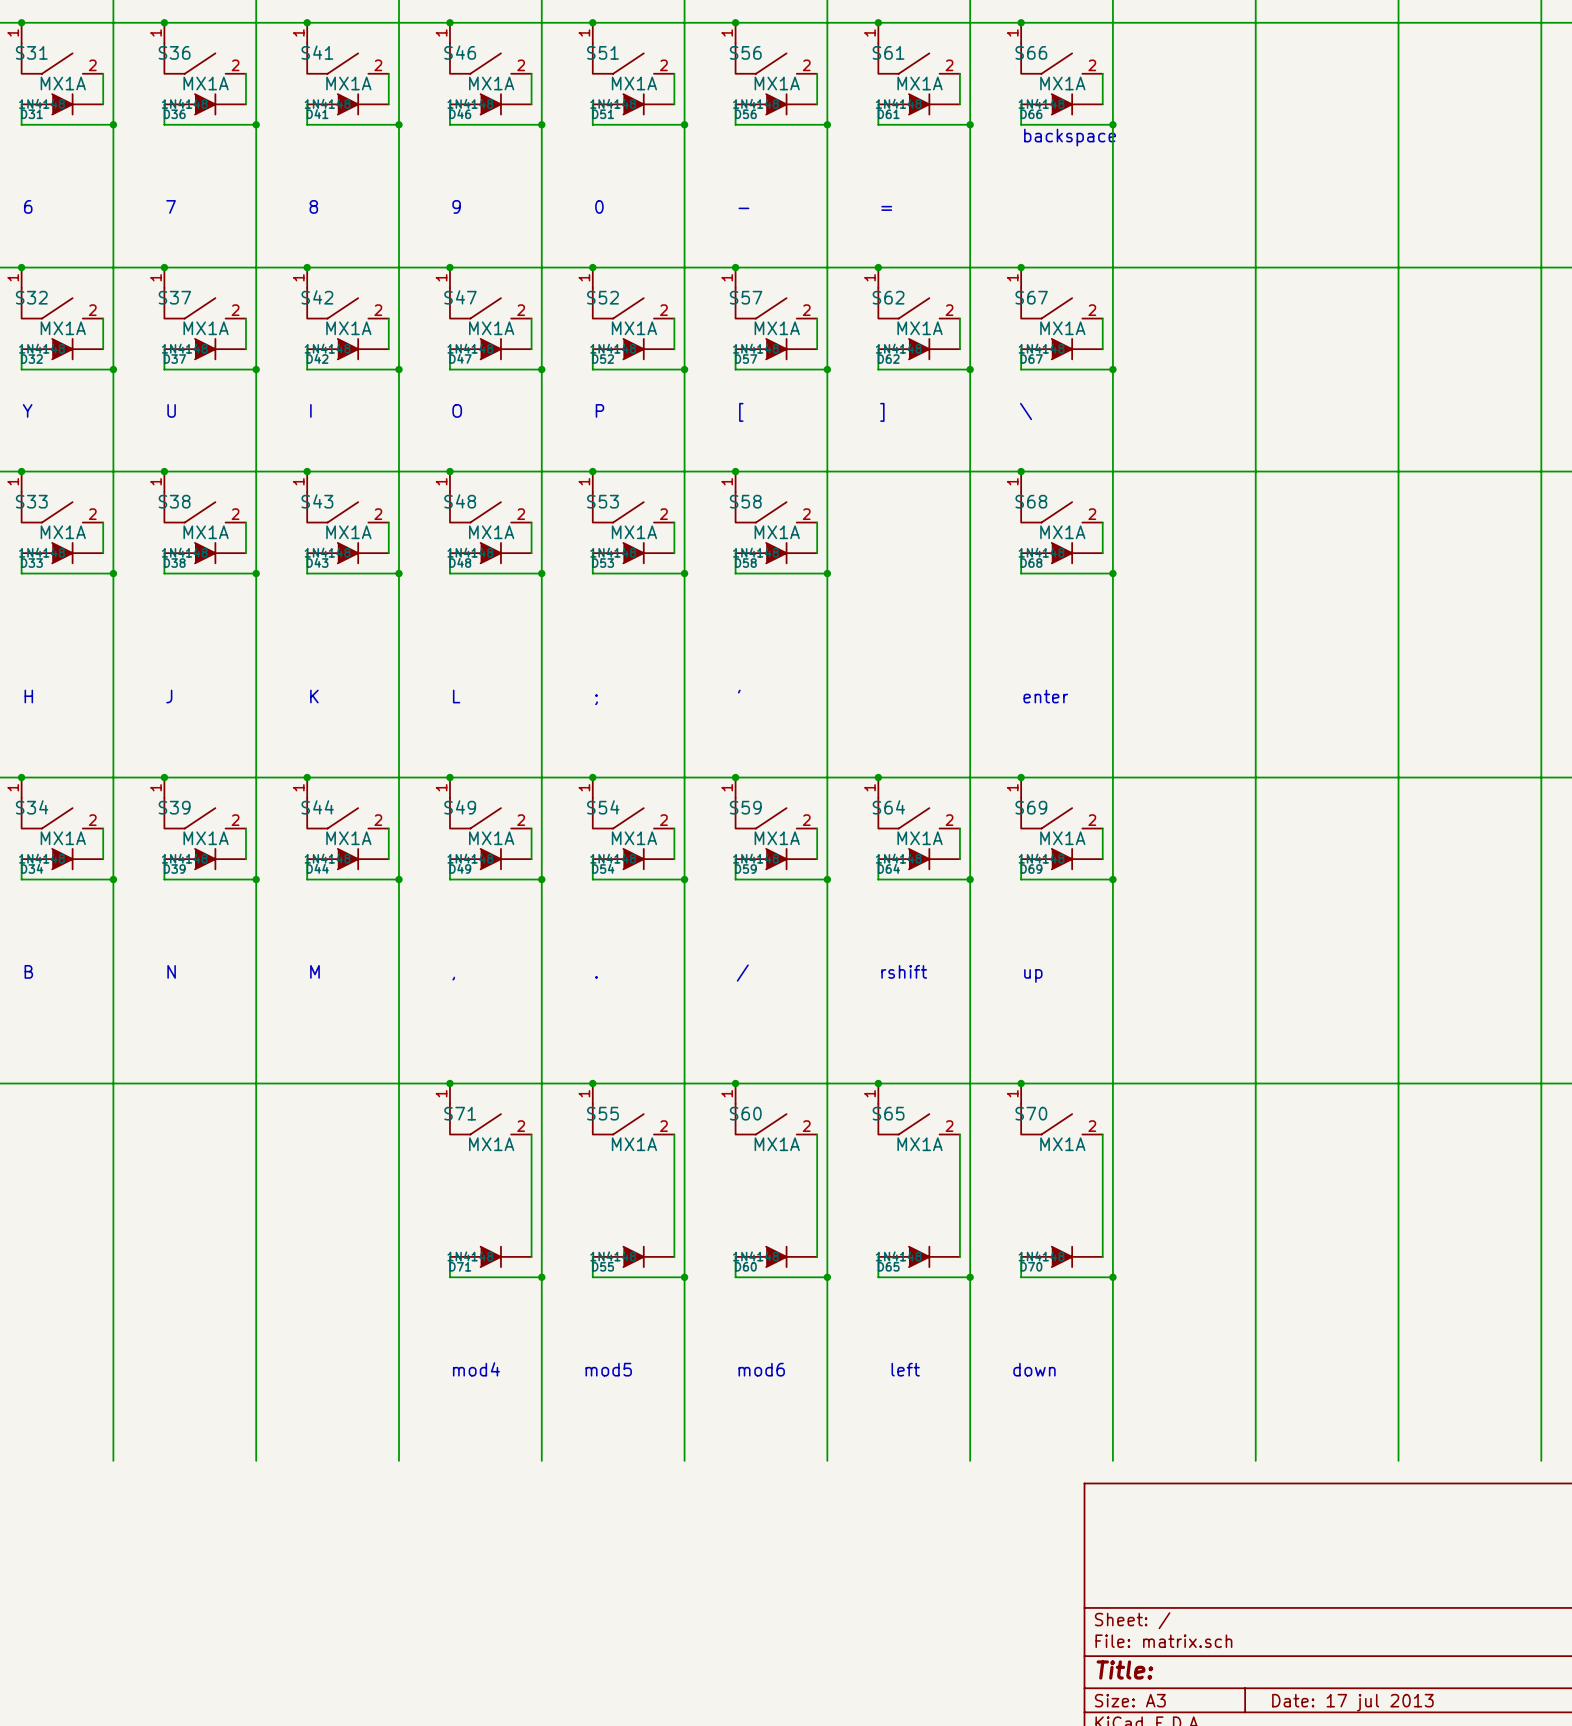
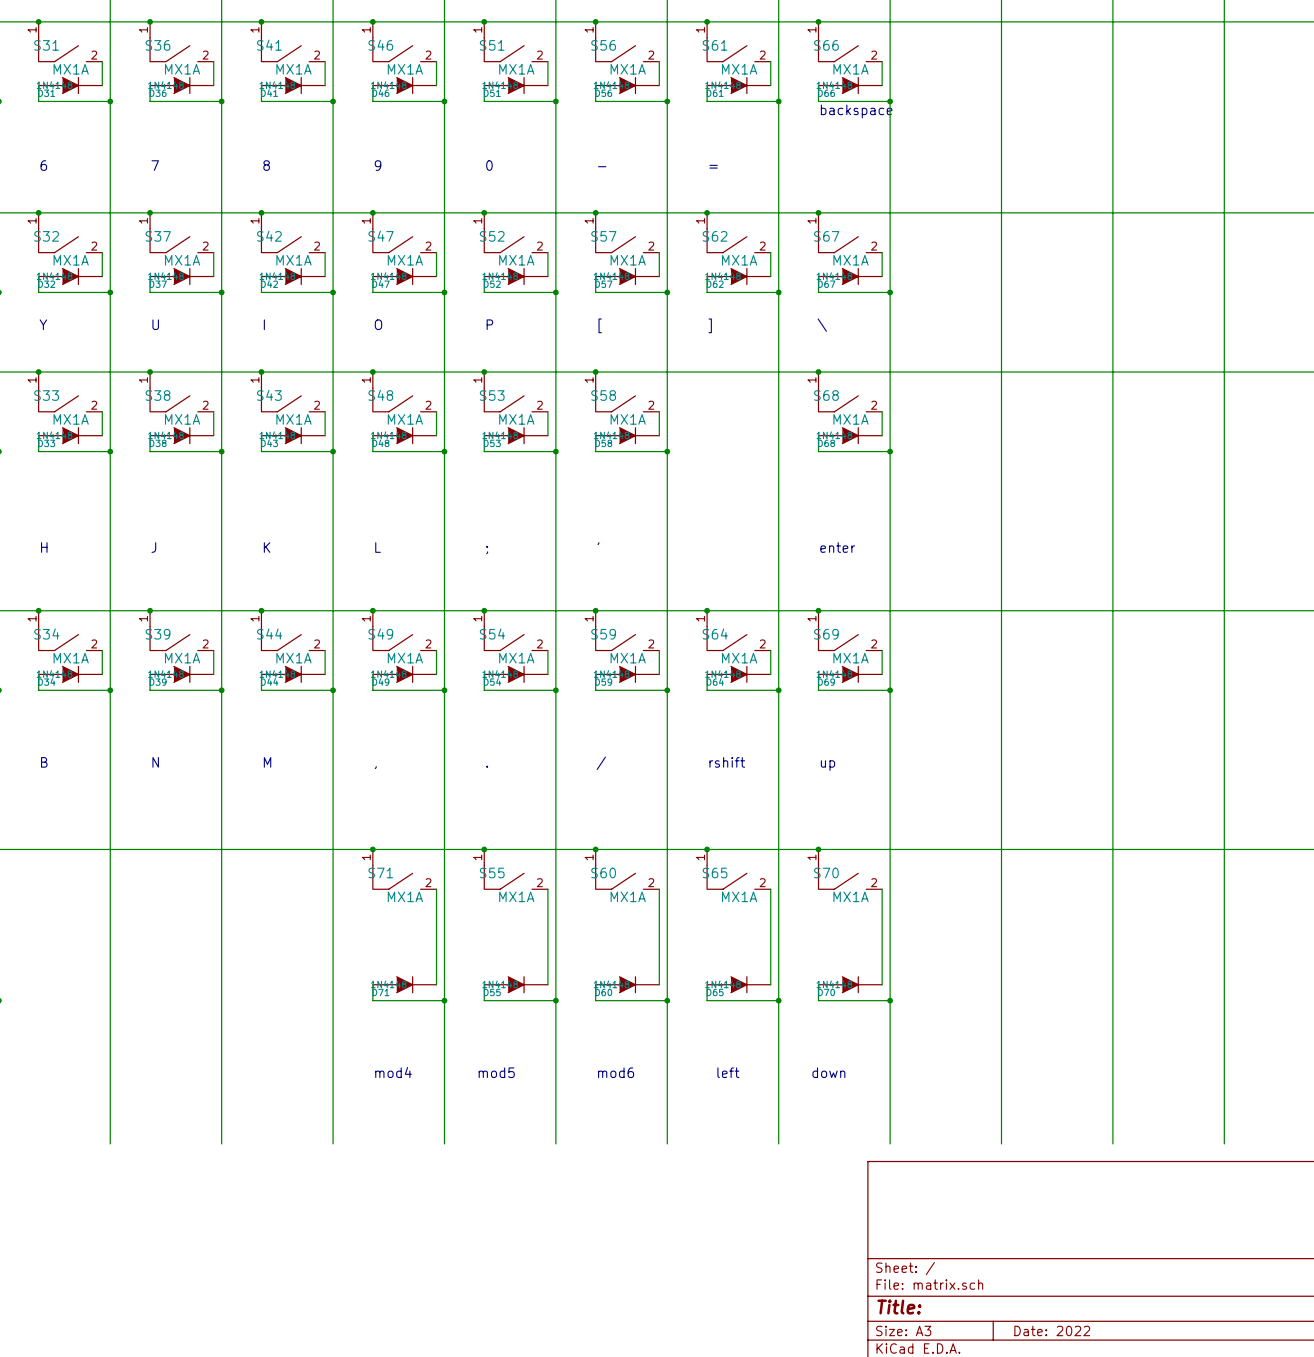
title block: Date: 17 jul 2013 (1352, 1702) -> Date: 2022 (1052, 1330)

